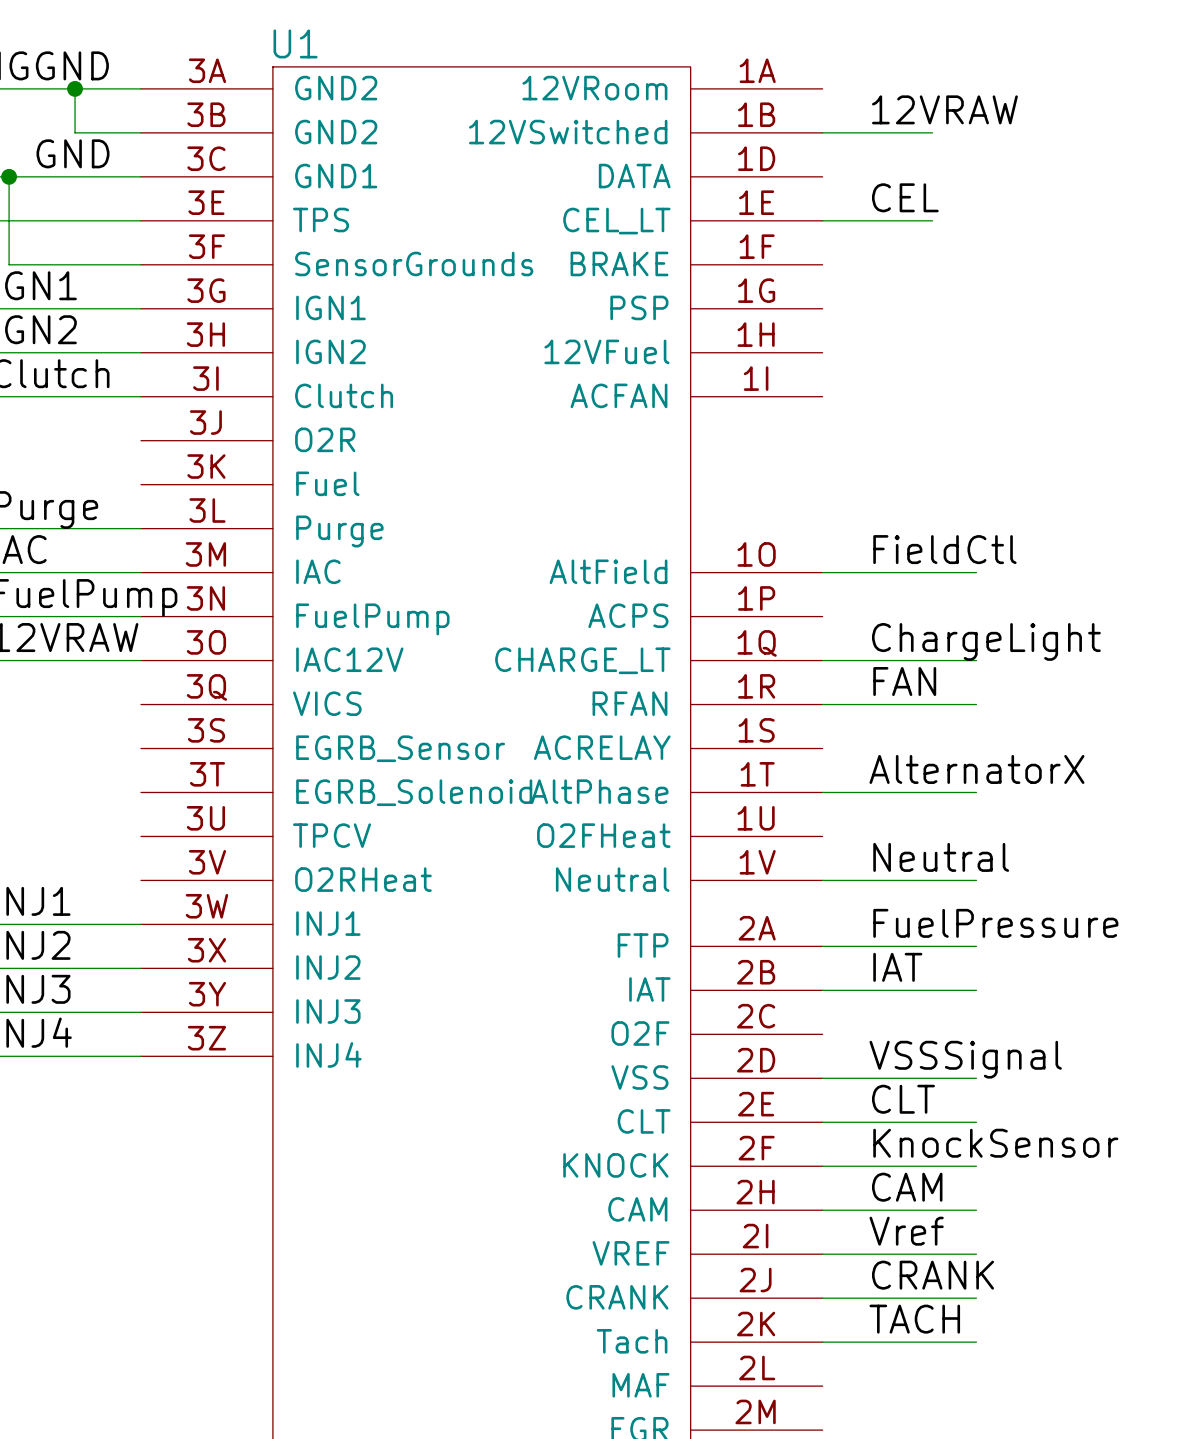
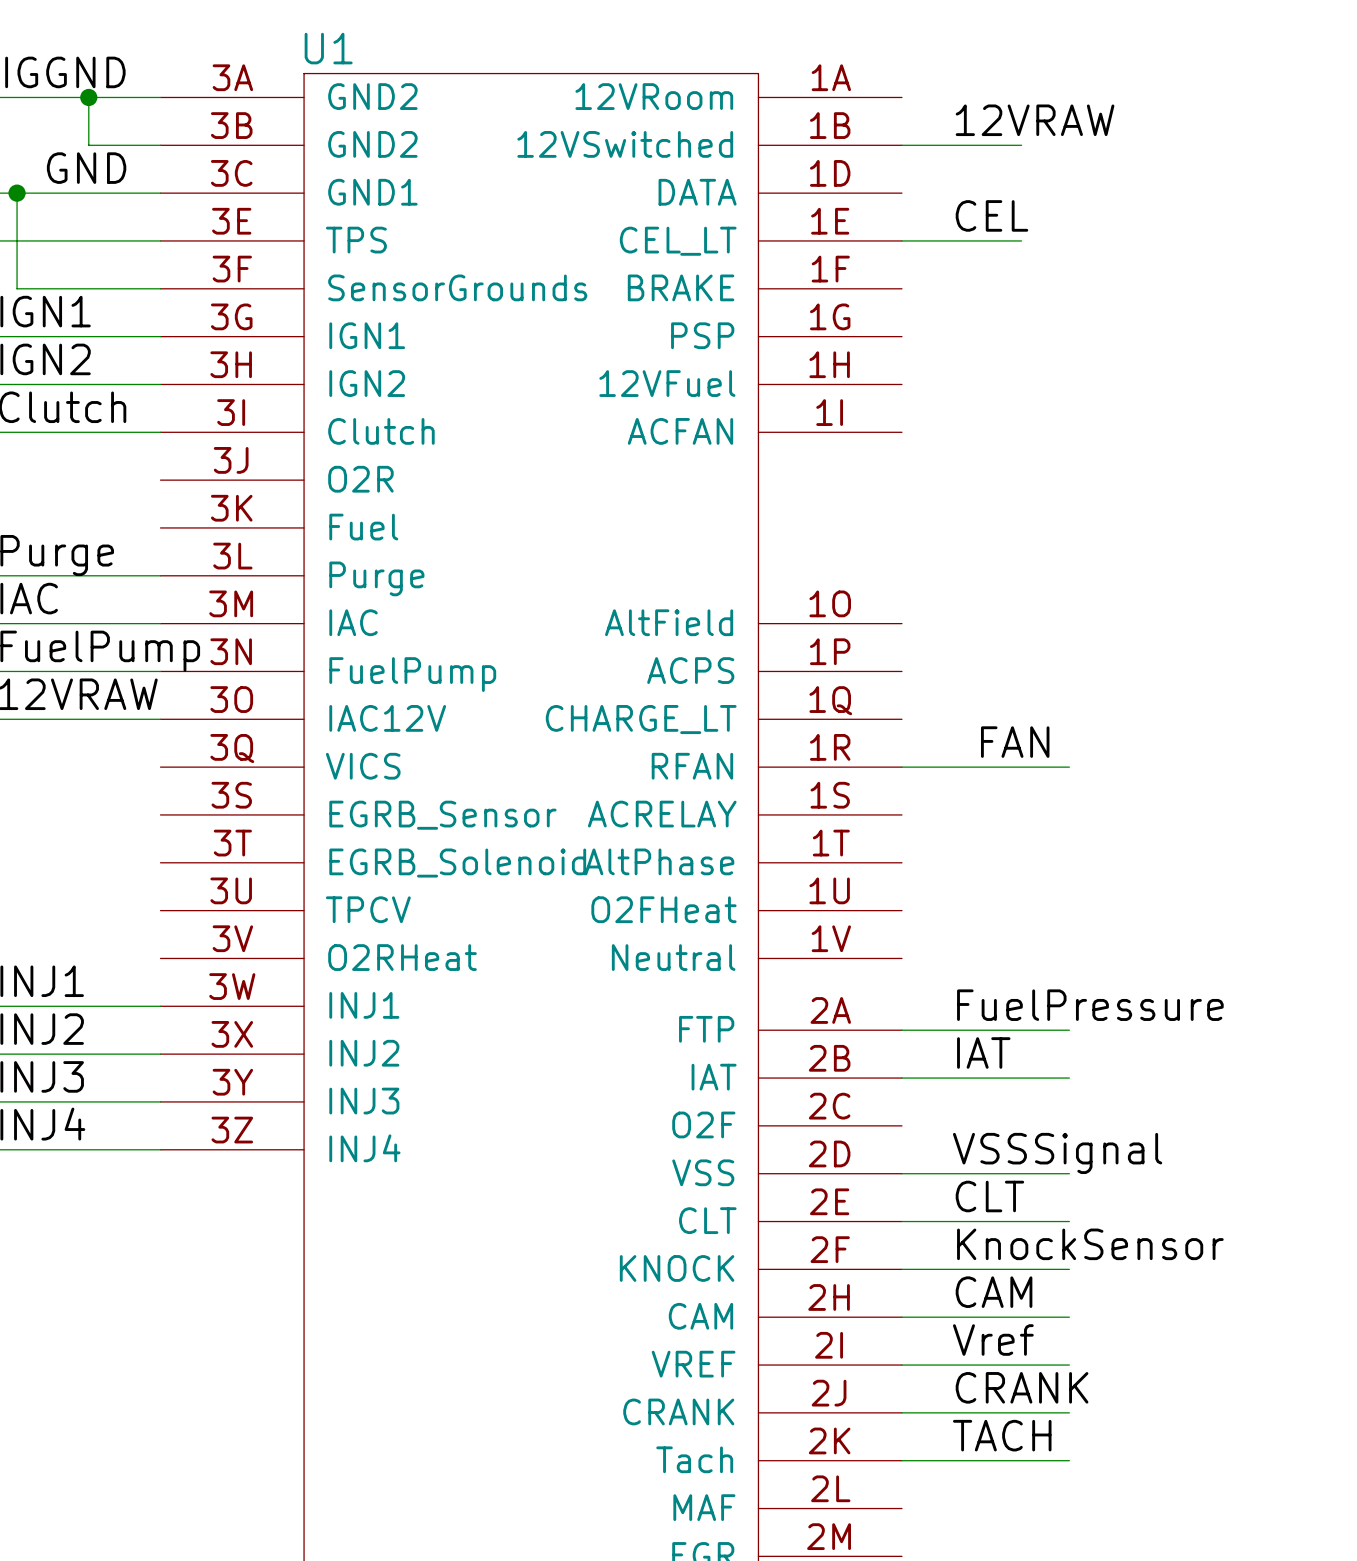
label: FieldCtl (944, 549) -> none
wire: (822, 572) (976, 572) -> none
label: ChargeLight (986, 641) -> none
wire: (822, 660) (976, 660) -> none
label position: FAN (904, 681) -> FAN (1015, 742)
label: AlternatorX (976, 769) -> none
wire: (822, 792) (976, 792) -> none
label: Neutral (941, 857) -> none
wire: (822, 880) (976, 880) -> none

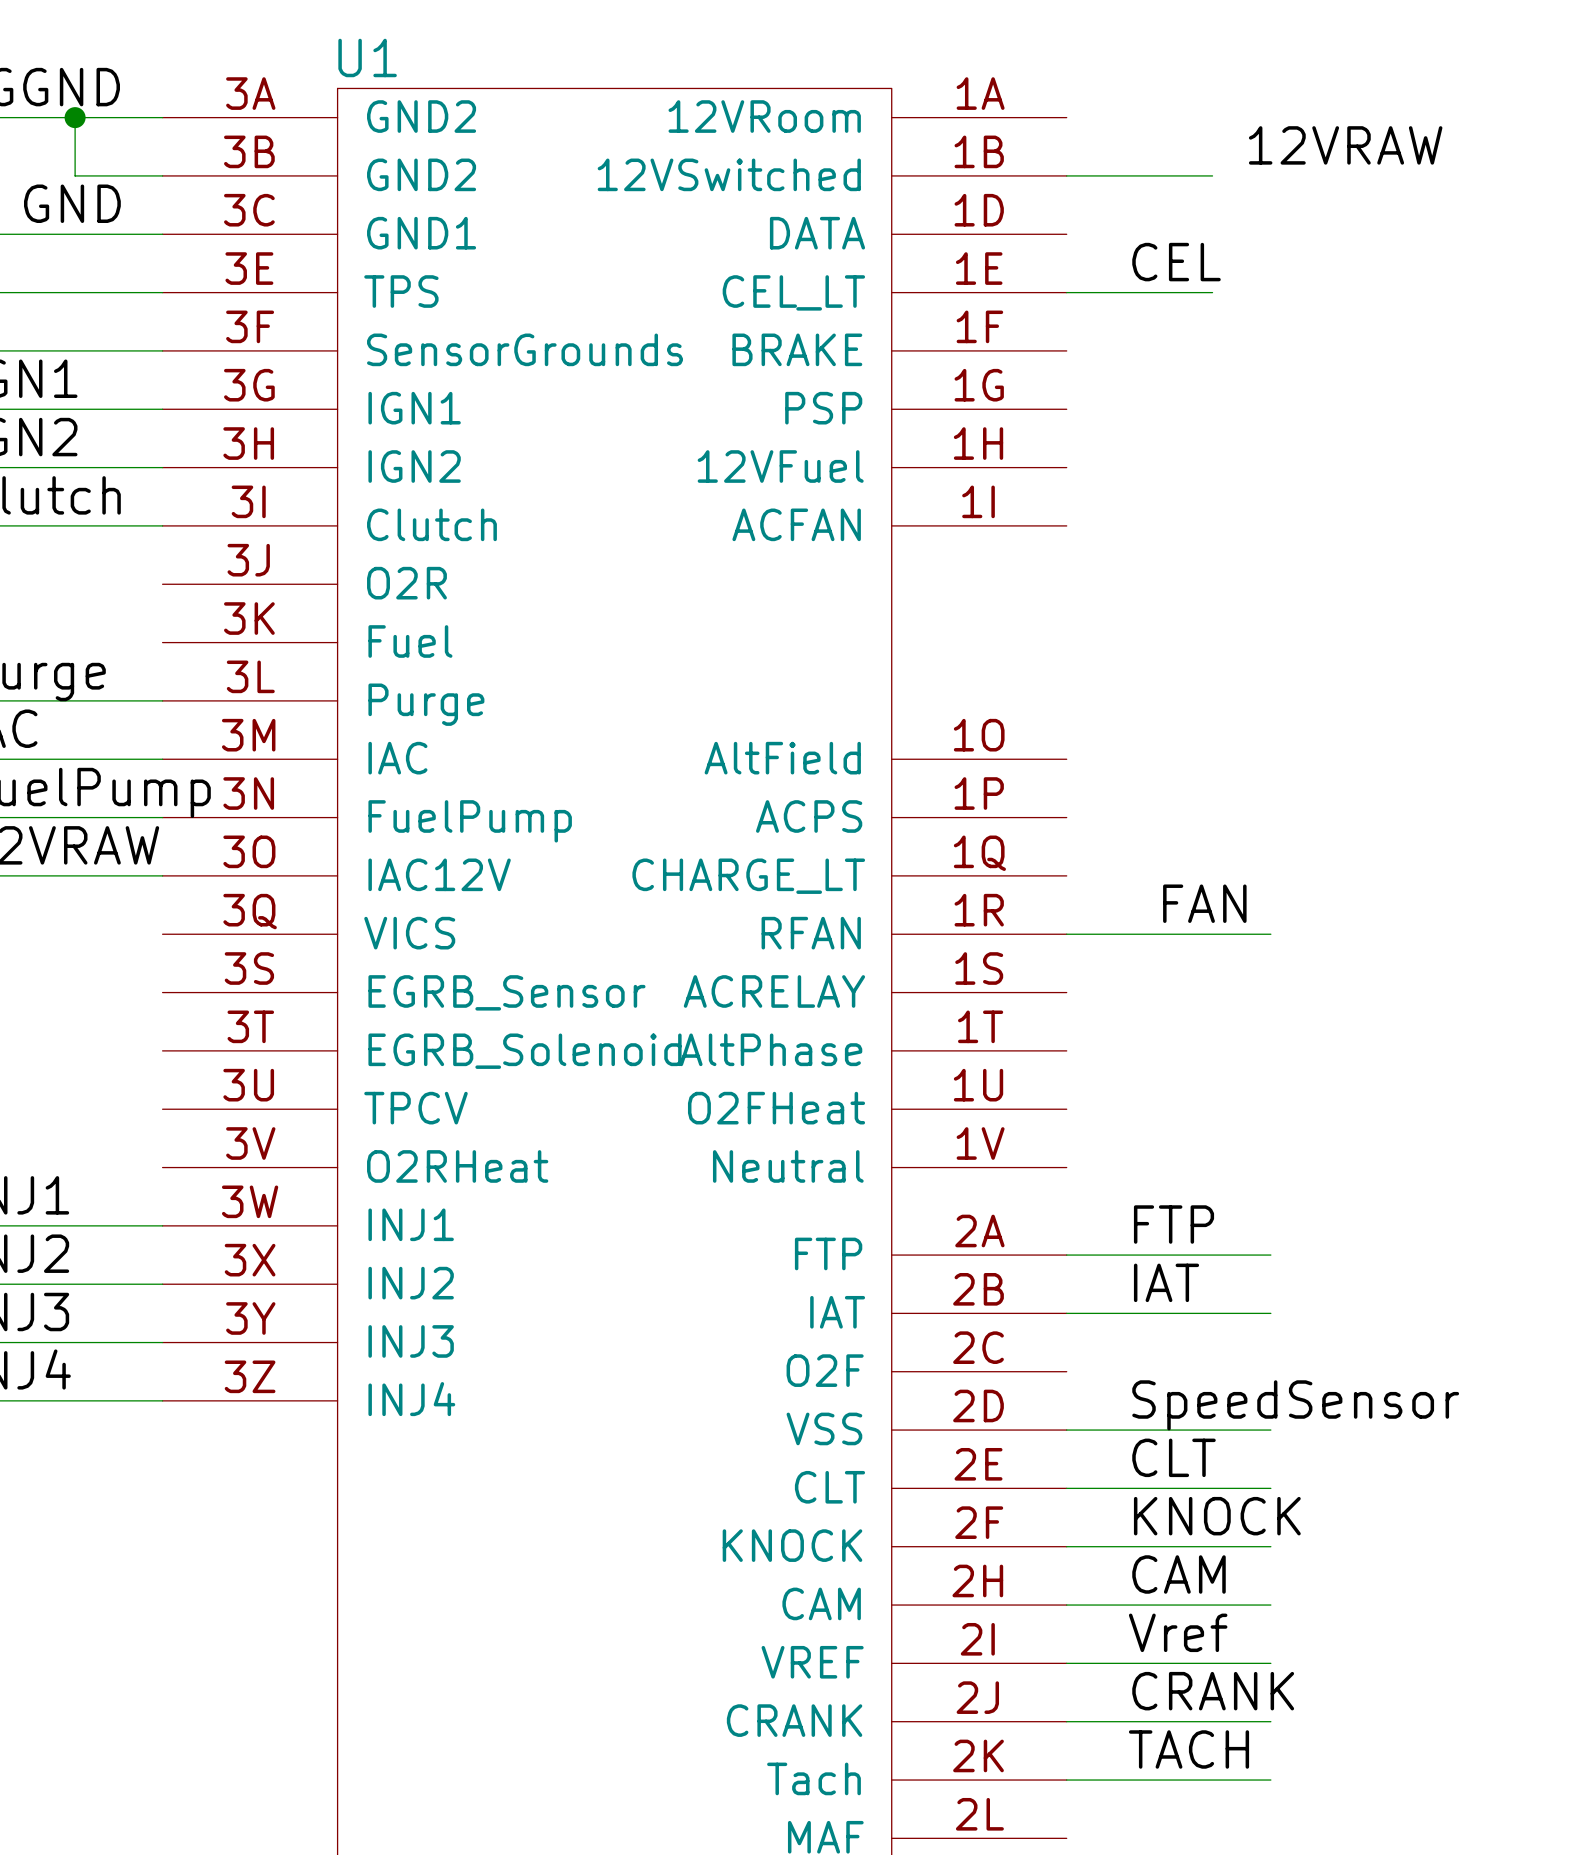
label position: 12VRAW (1035, 120) -> 12VRAW (1345, 145)
label: FuelPressure (1090, 1005) -> FTP (1174, 1224)
label: VSSSignal (1057, 1153) -> SpeedSensor (1295, 1405)
label: KnockSensor (1090, 1244) -> KNOCK (1217, 1516)

